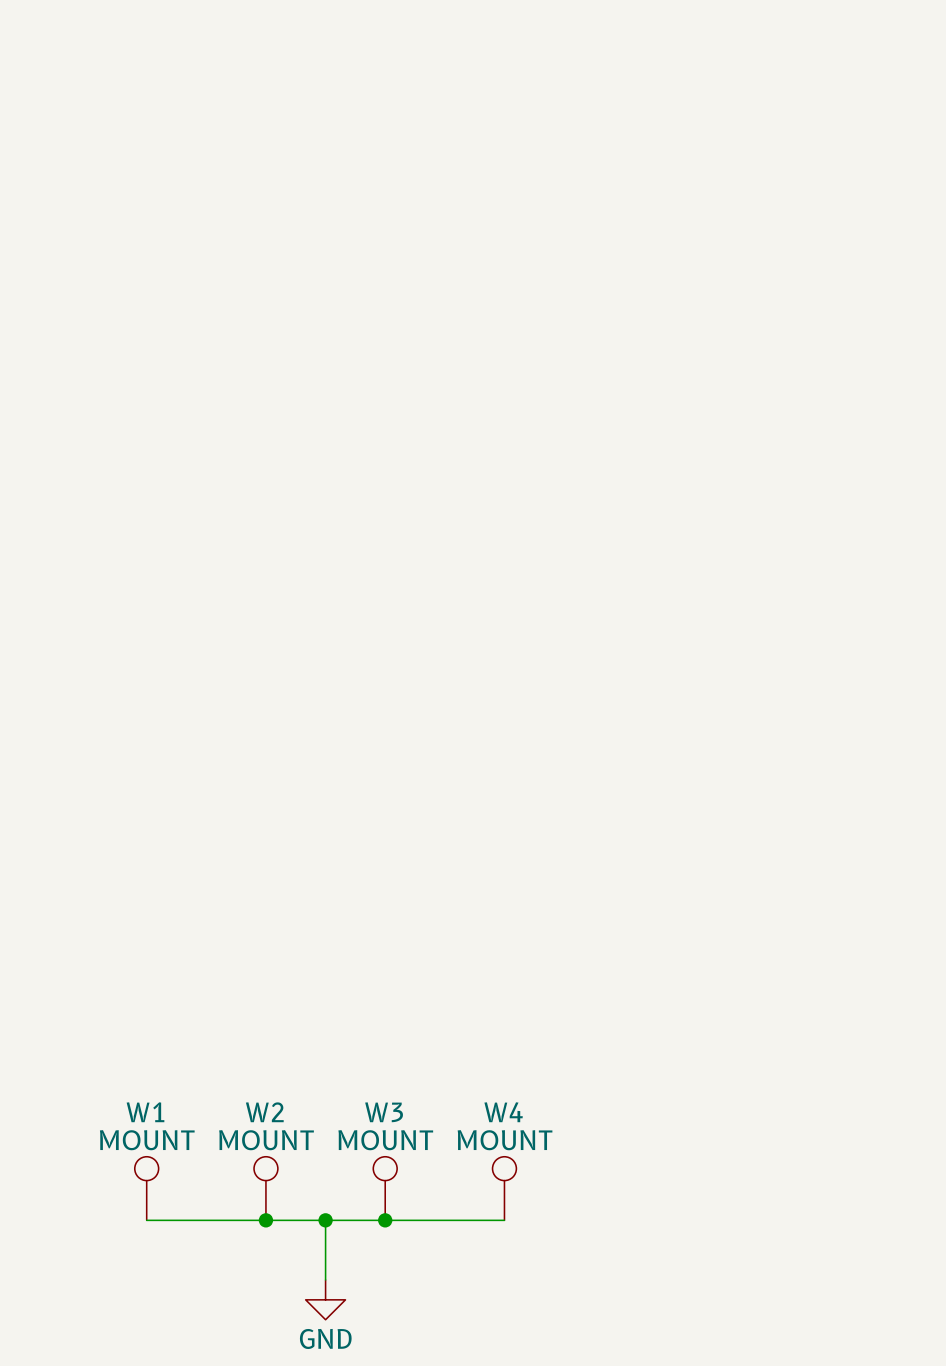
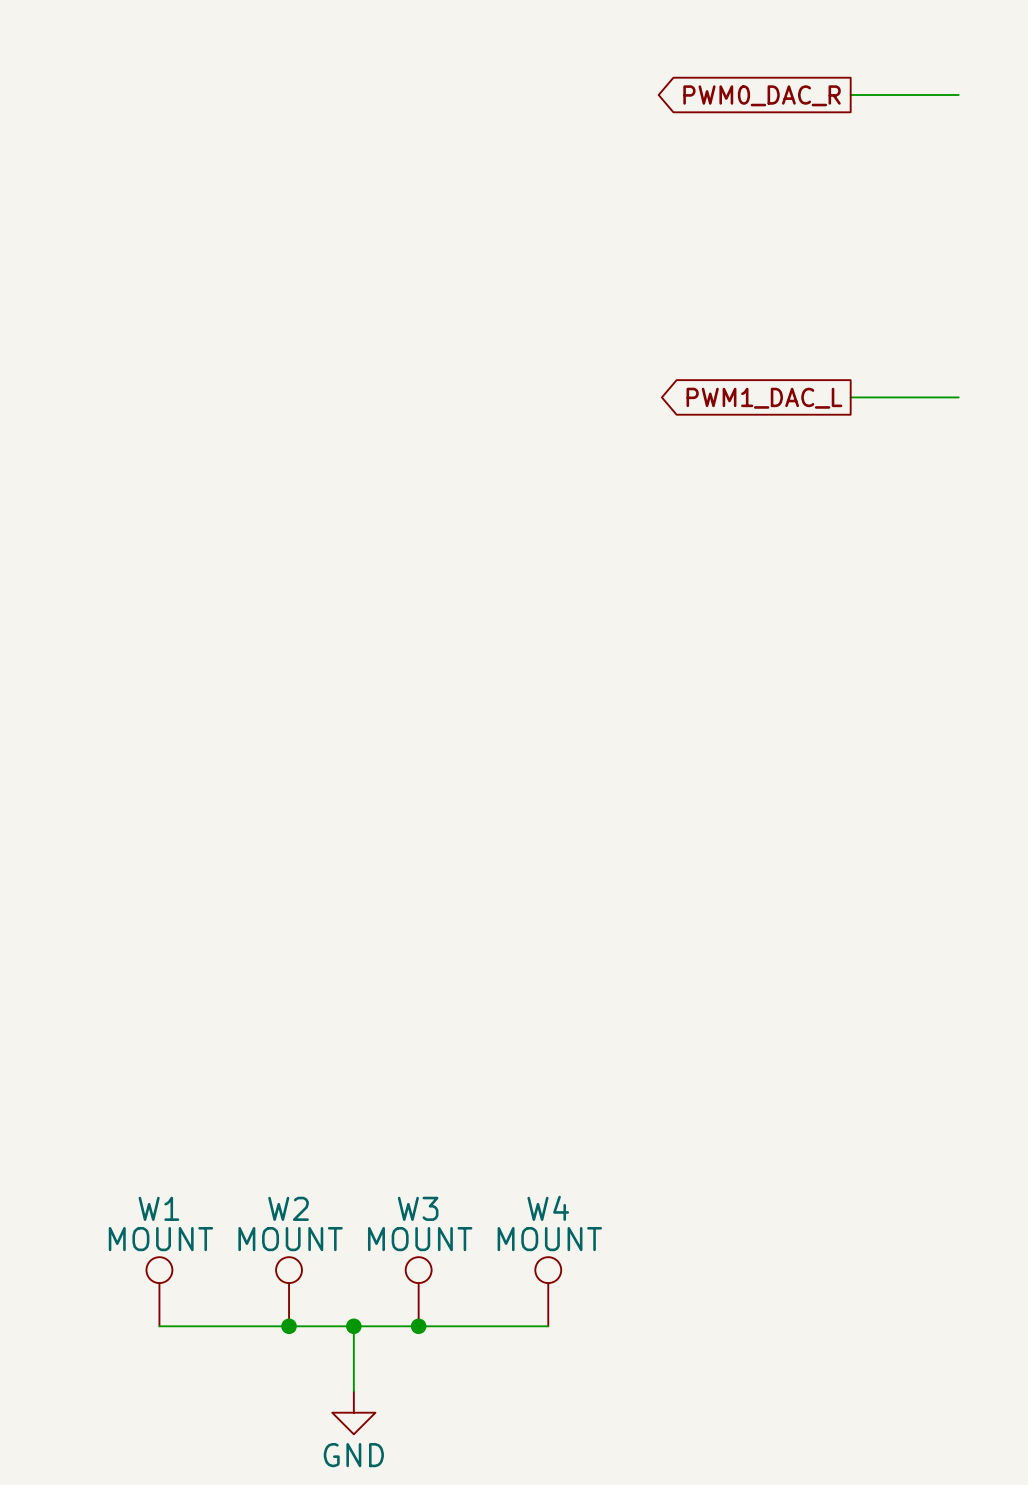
wire: none -> (850, 95) (958, 95)
global label: none -> PWM0_DAC_R (762, 95)
wire: none -> (850, 397) (958, 397)
global label: none -> PWM1_DAC_L (764, 398)

